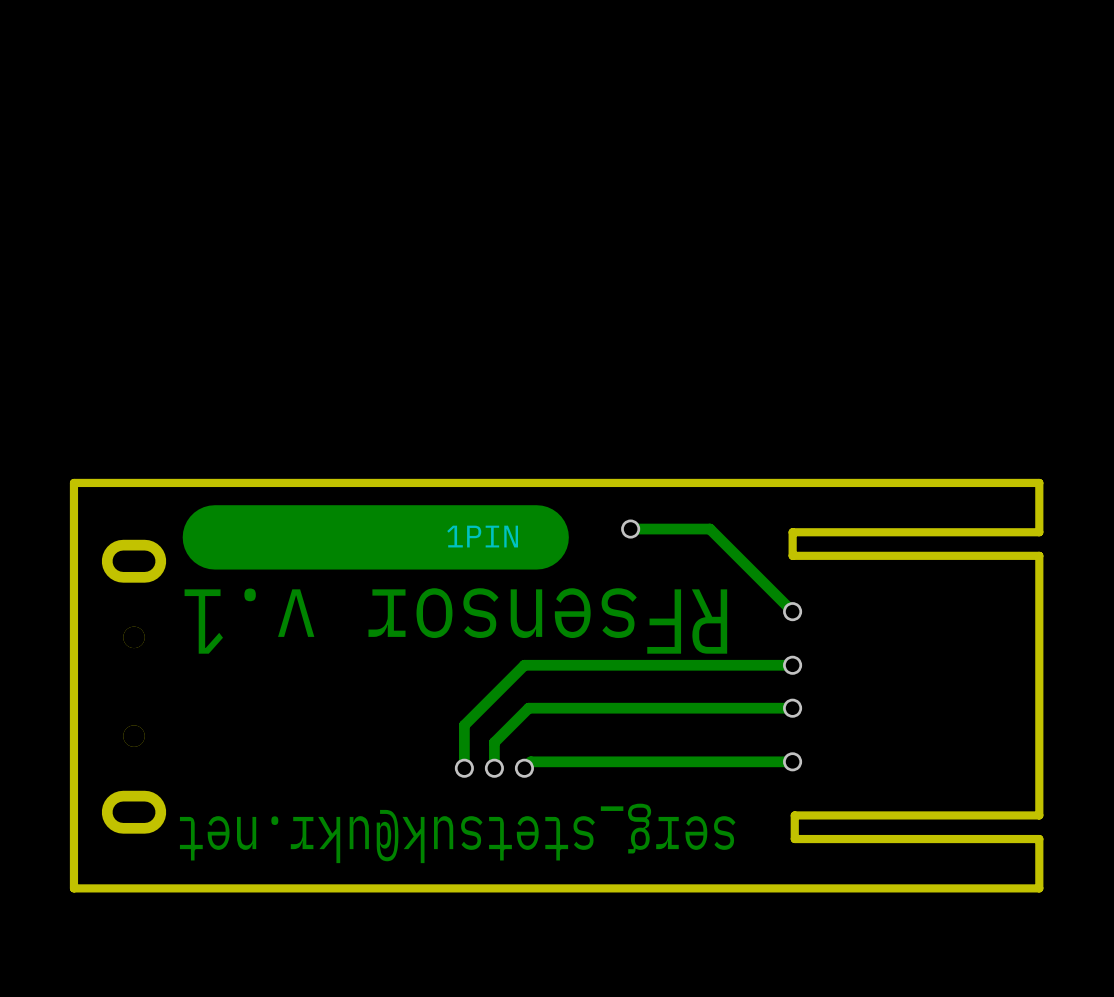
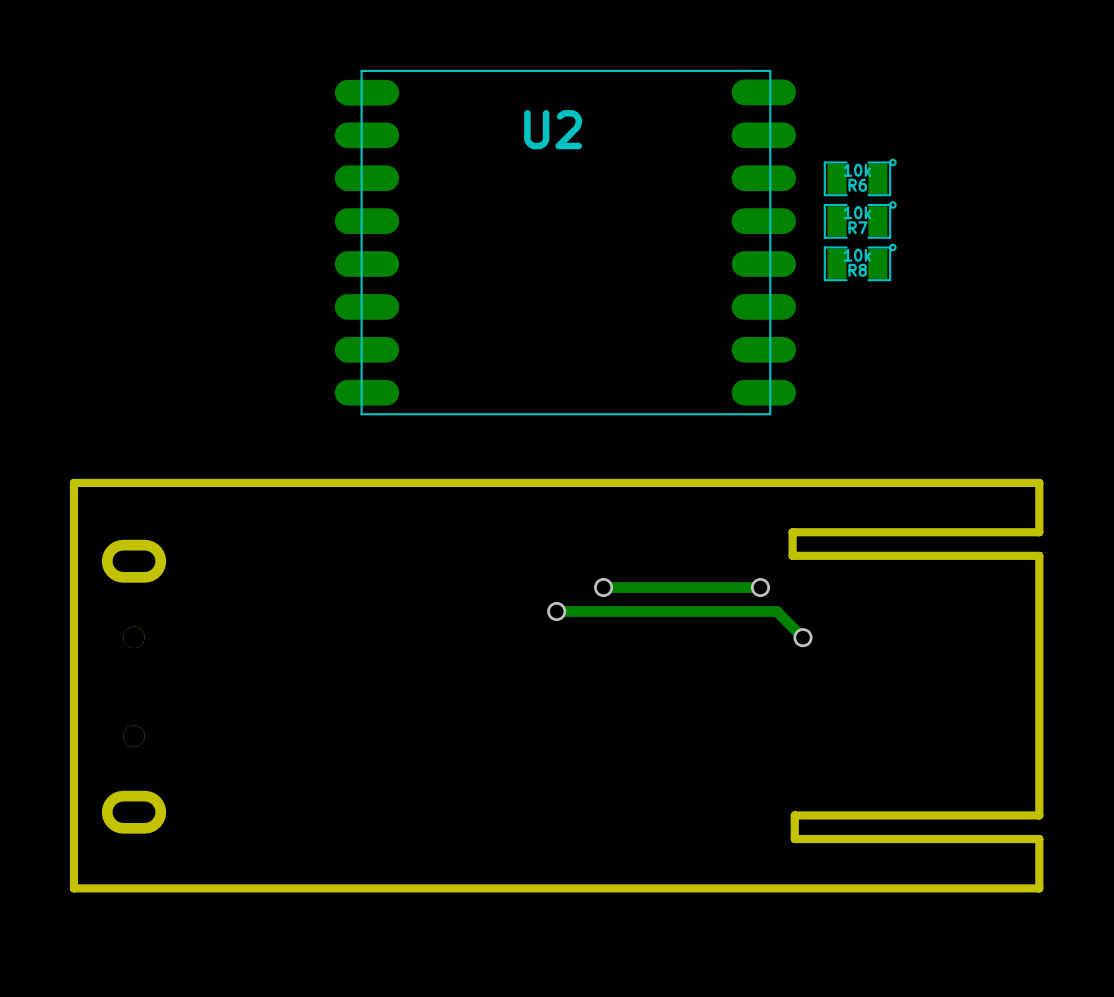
R6: none -> 10k (860, 177)
R7: none -> 10k (860, 219)
U2: none -> (565, 242)
R8: none -> 10k (860, 262)
track: (630, 529) (709, 529) (792, 611) -> none
via: (630, 529) -> none
1PIN: (375, 537) -> none
via: none -> (603, 587)
track: none -> (760, 587) (603, 587)
via: none -> (760, 587)
track: none -> (556, 611) (776, 611) (802, 637)
via: none -> (556, 611)
via: (792, 611) -> none
text: RFsensor v.1 (455, 620) -> none
via: none -> (802, 637)
track: (792, 665) (524, 665) (464, 725) (464, 768) -> none
via: (792, 665) -> none
track: (792, 708) (528, 708) (494, 742) (494, 768) -> none
via: (792, 708) -> none
track: (792, 761) (530, 761) (524, 768) -> none
via: (792, 761) -> none
via: (464, 768) -> none
via: (494, 768) -> none
via: (524, 768) -> none
text: serg_stetsuk@ukr.net (457, 833) -> none

